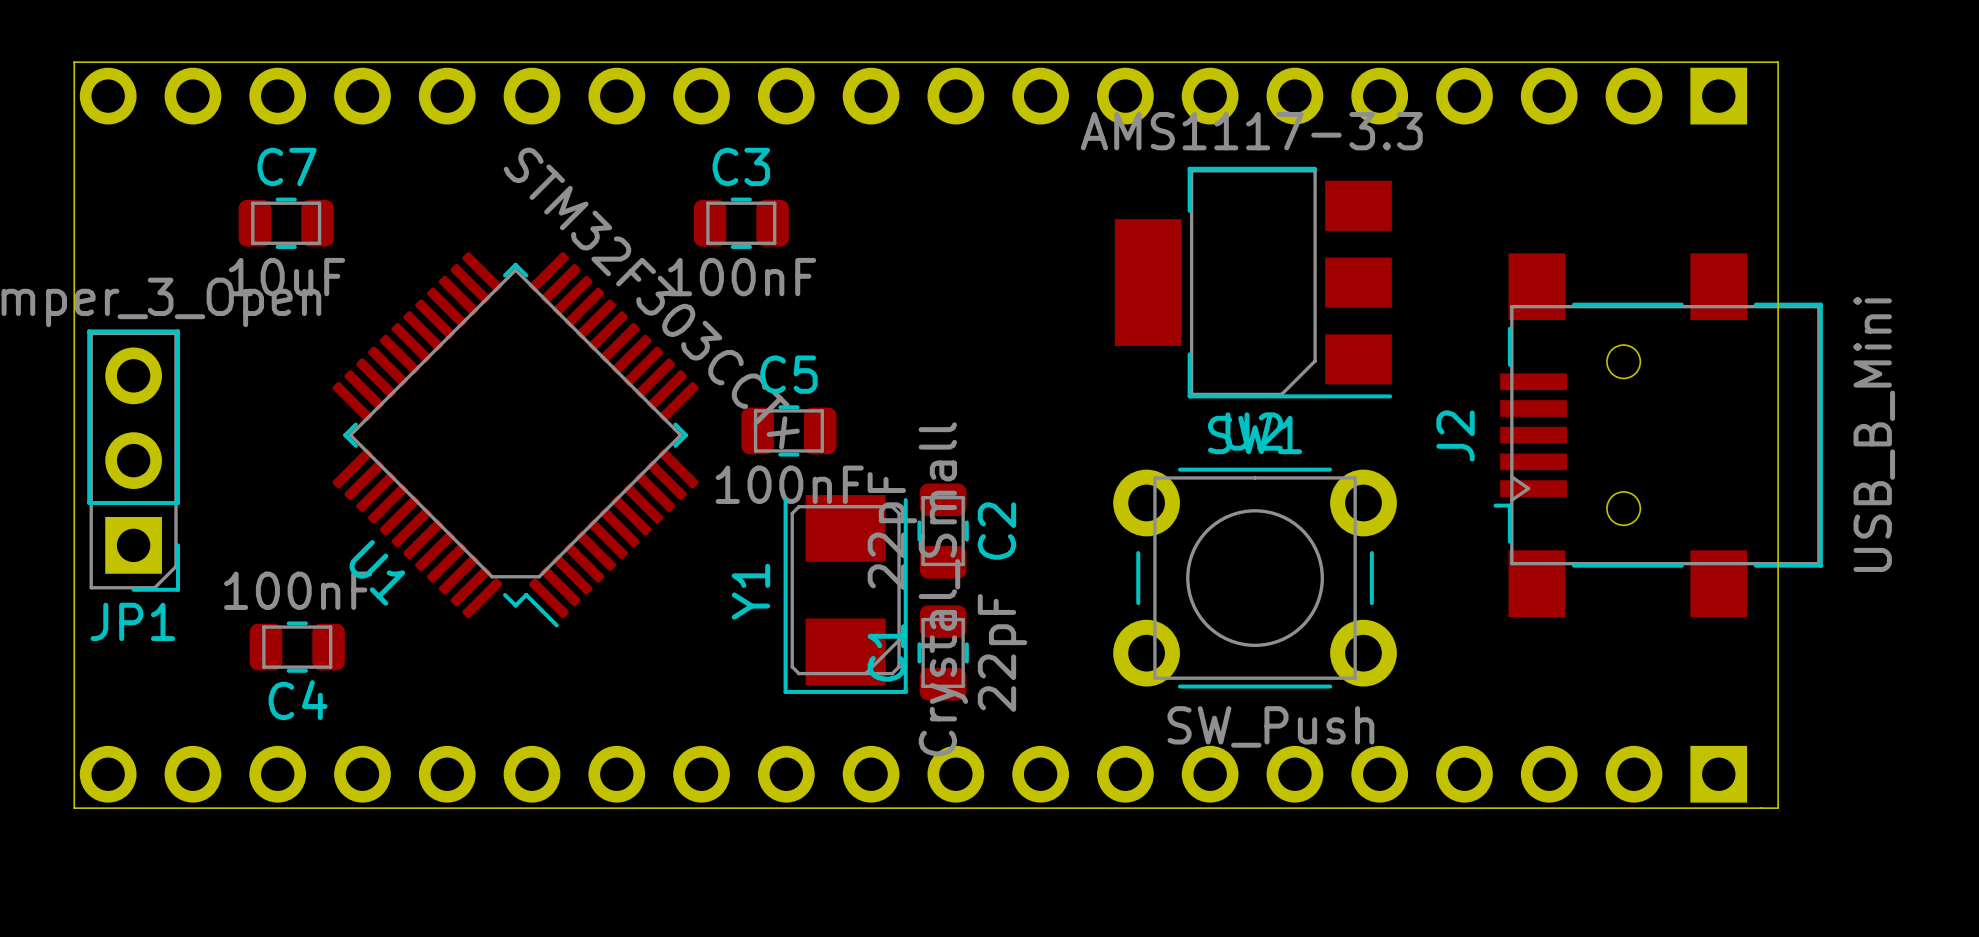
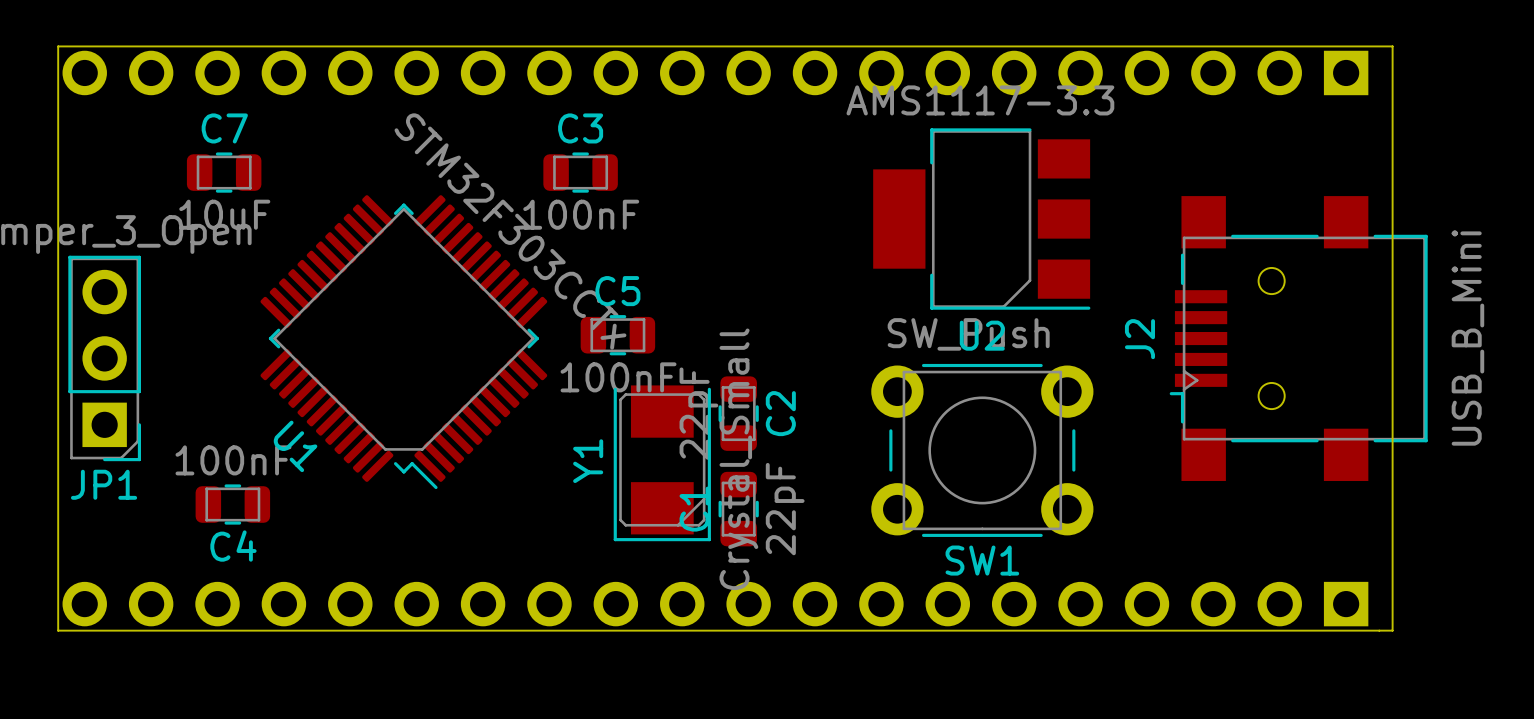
SW1 rotation: 0° (1255, 578) -> 180° (982, 450)

